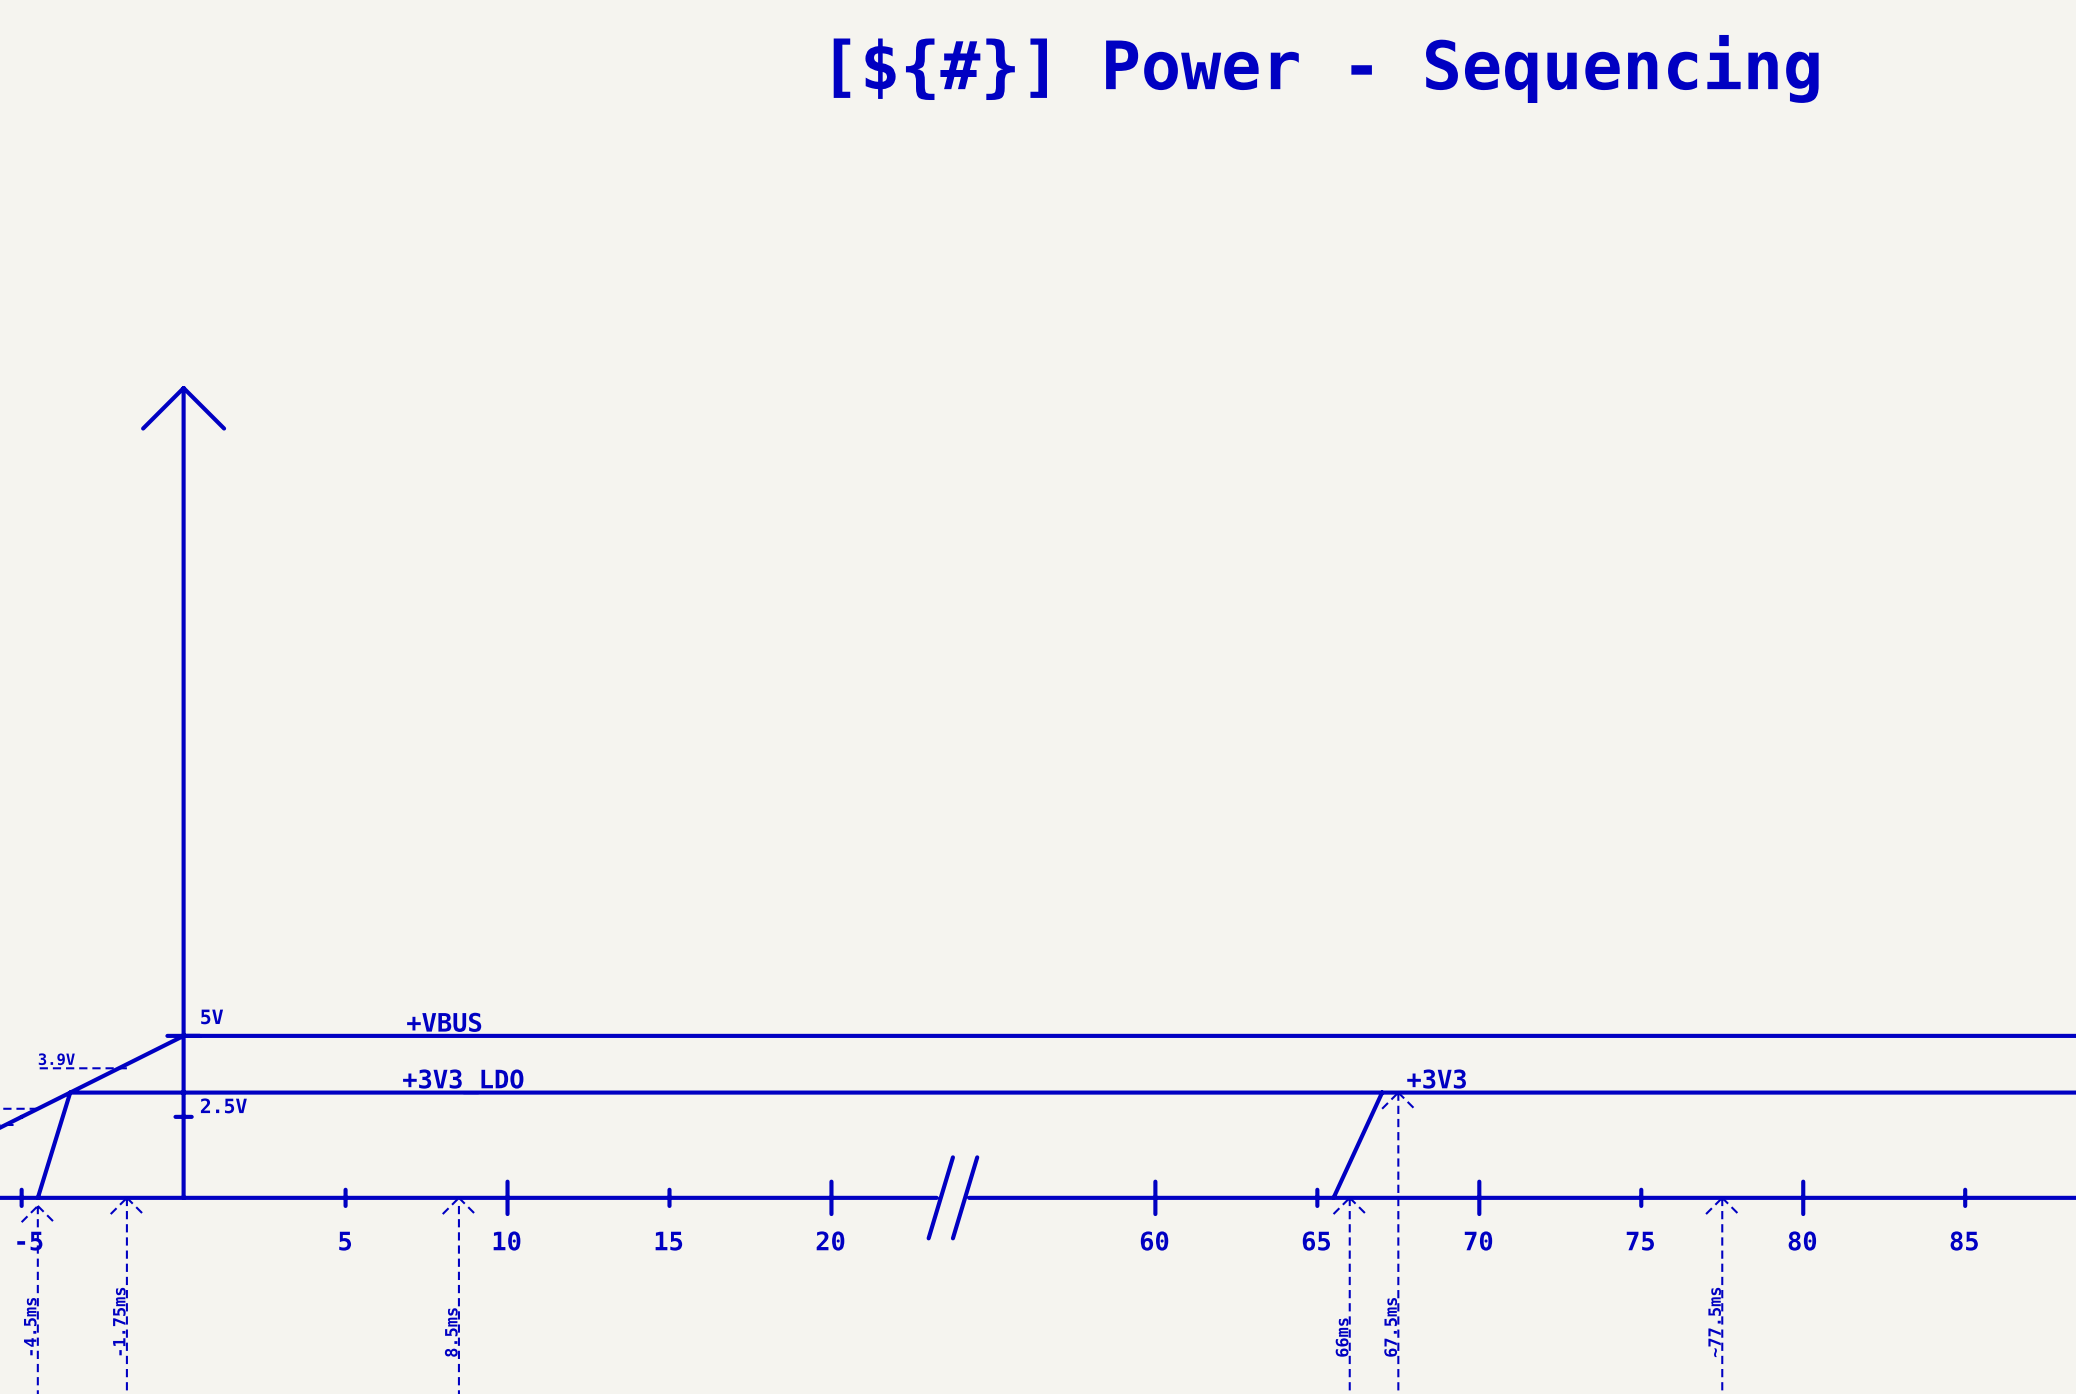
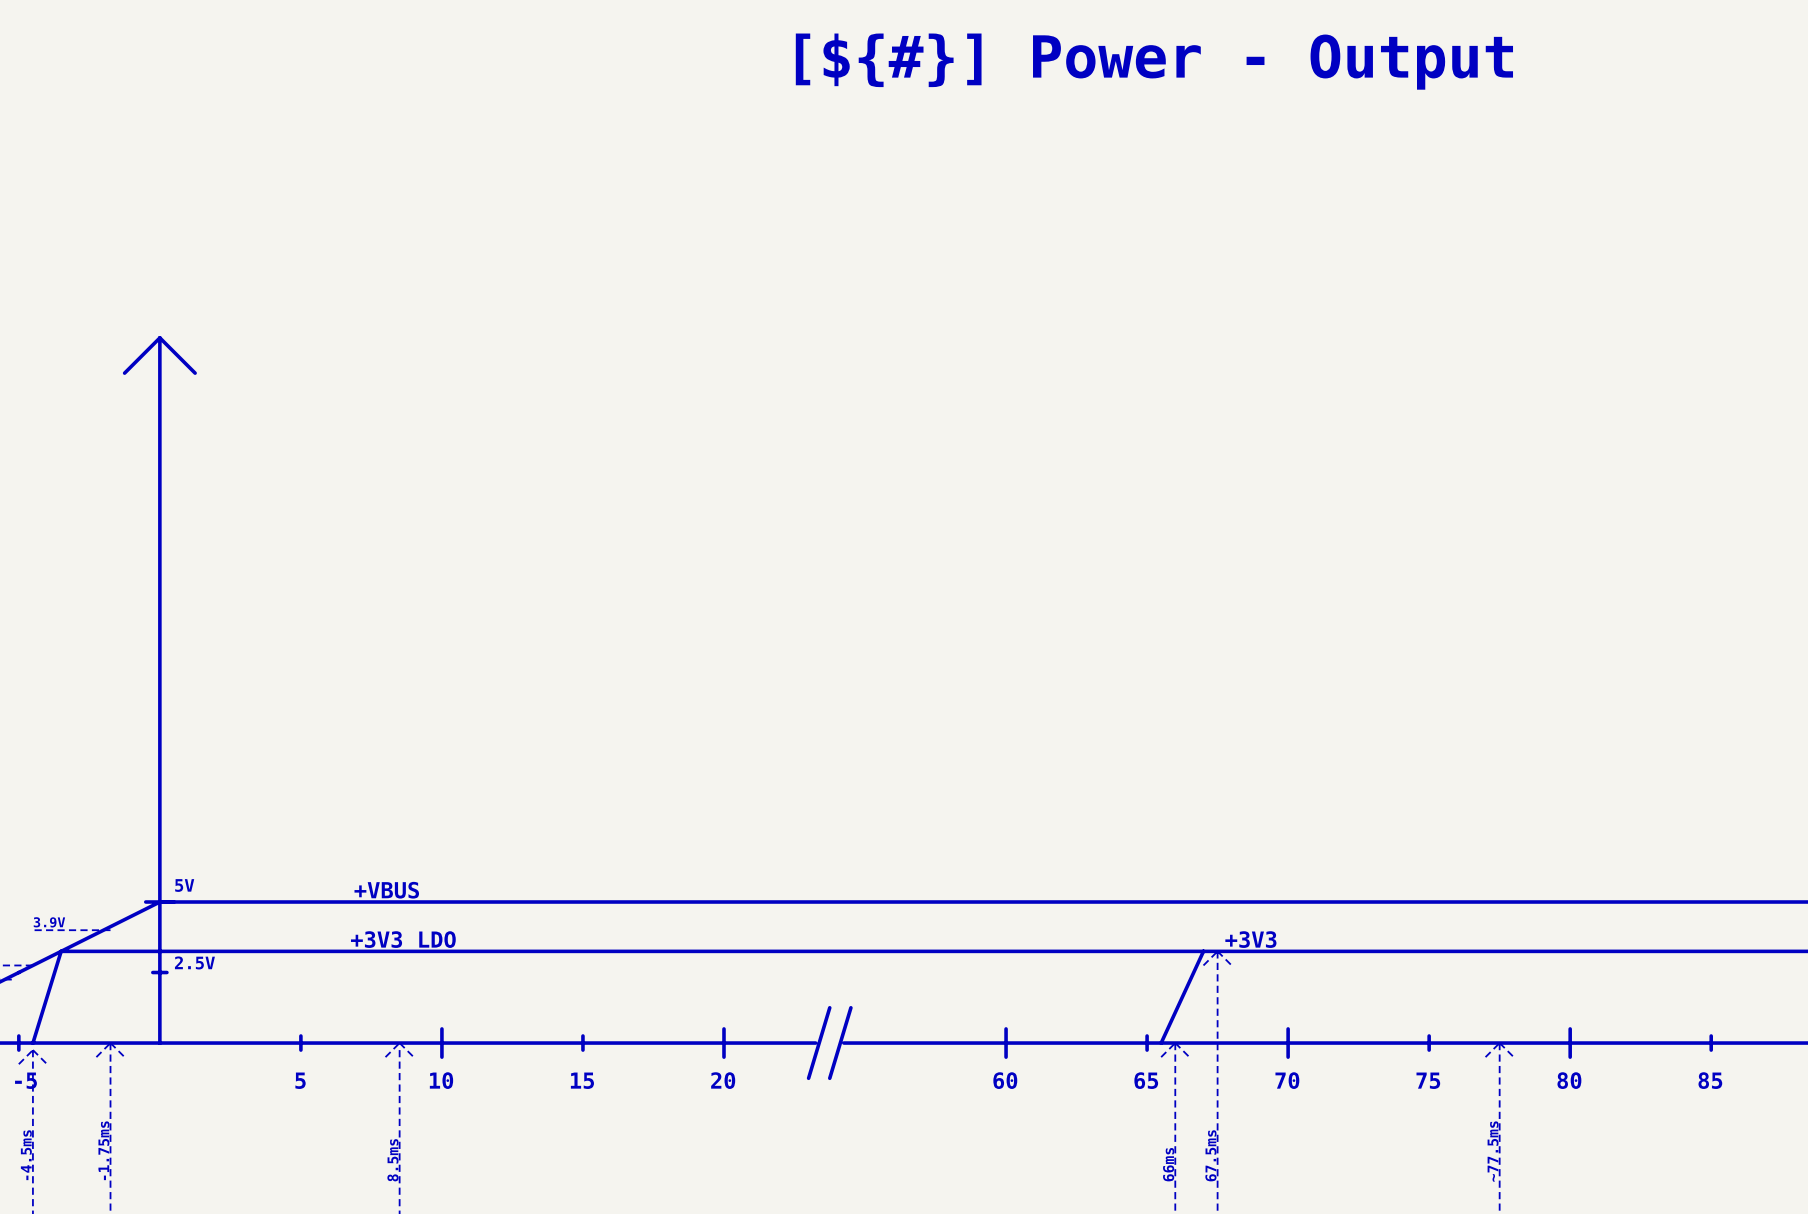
text: [${#}] Power - Sequencing (1326, 68) -> [${#}] Power - Output (1154, 61)

